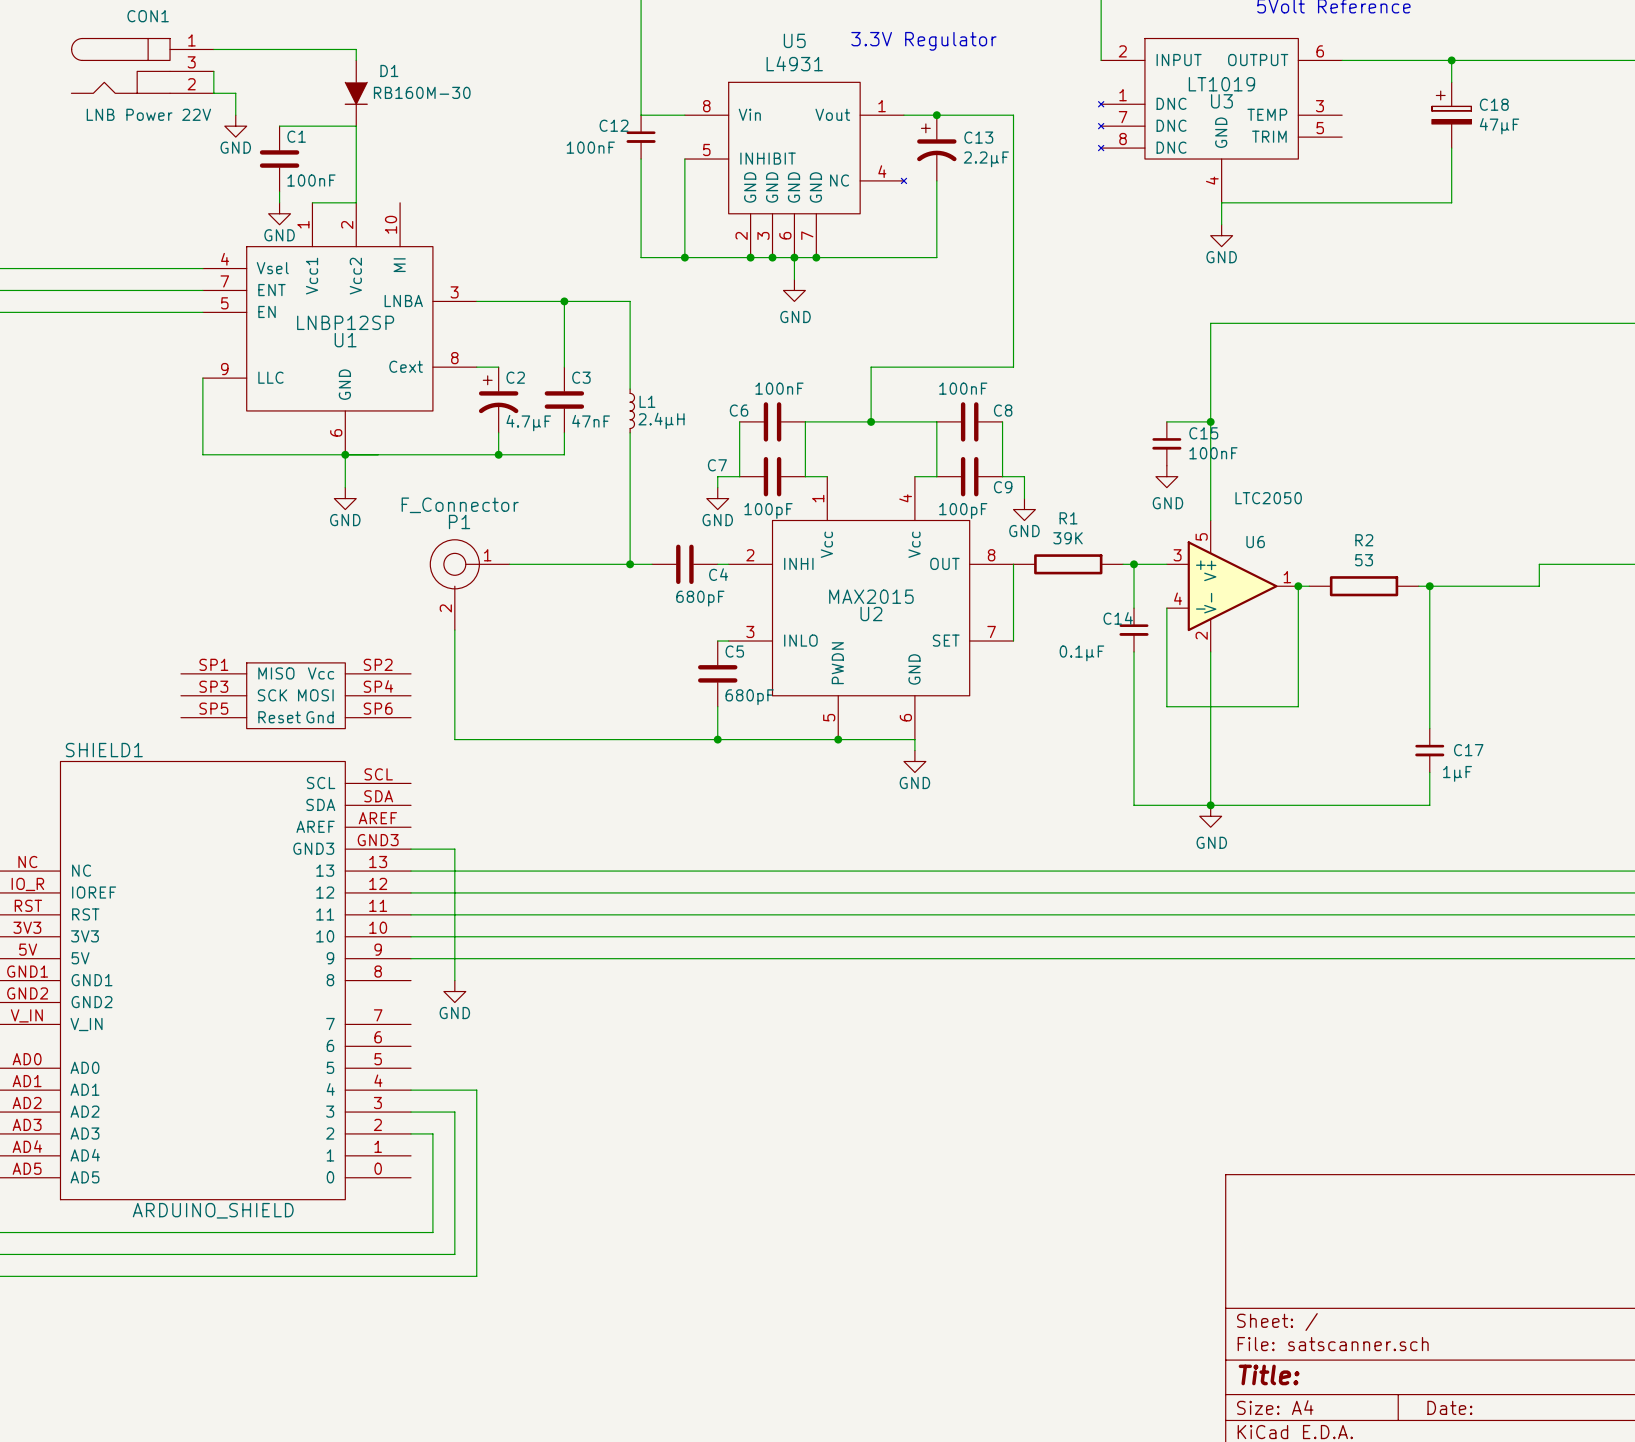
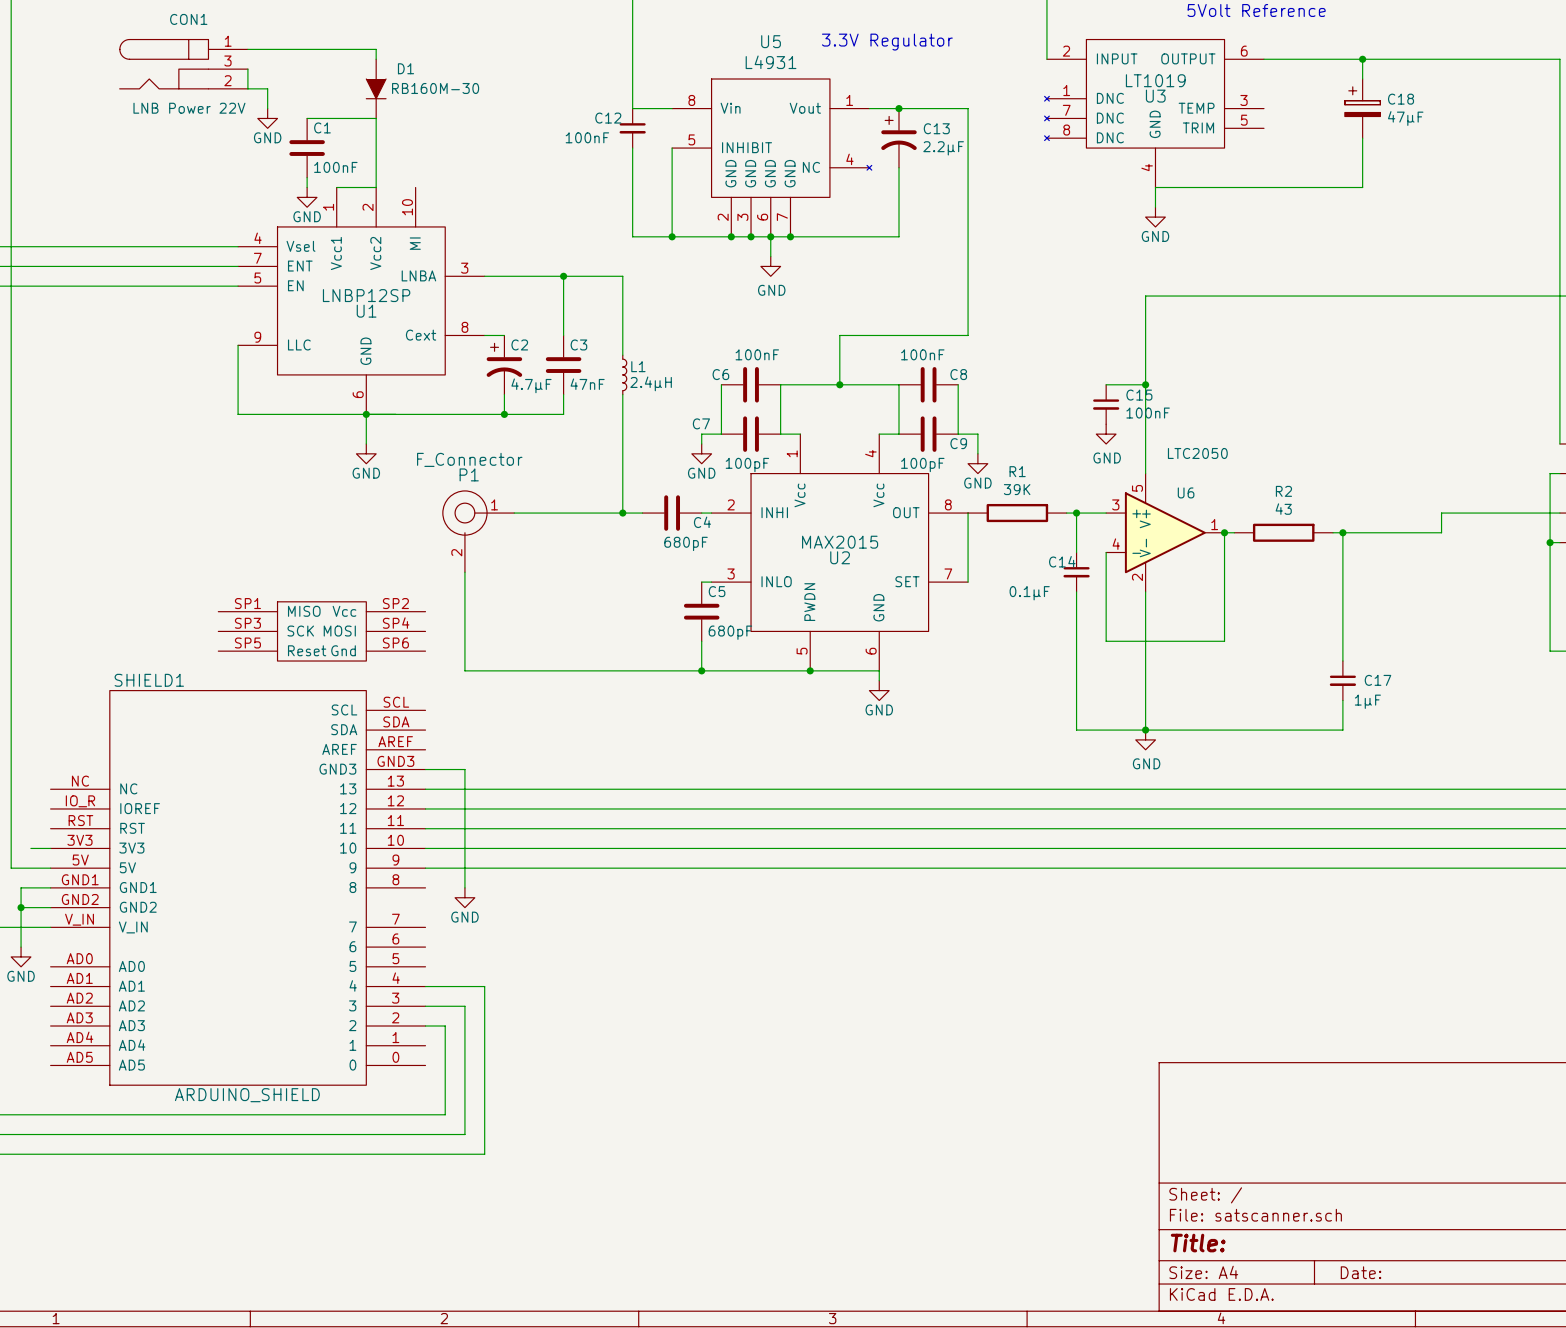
R2 value: 53 (1364, 560) -> 43 (1283, 509)

